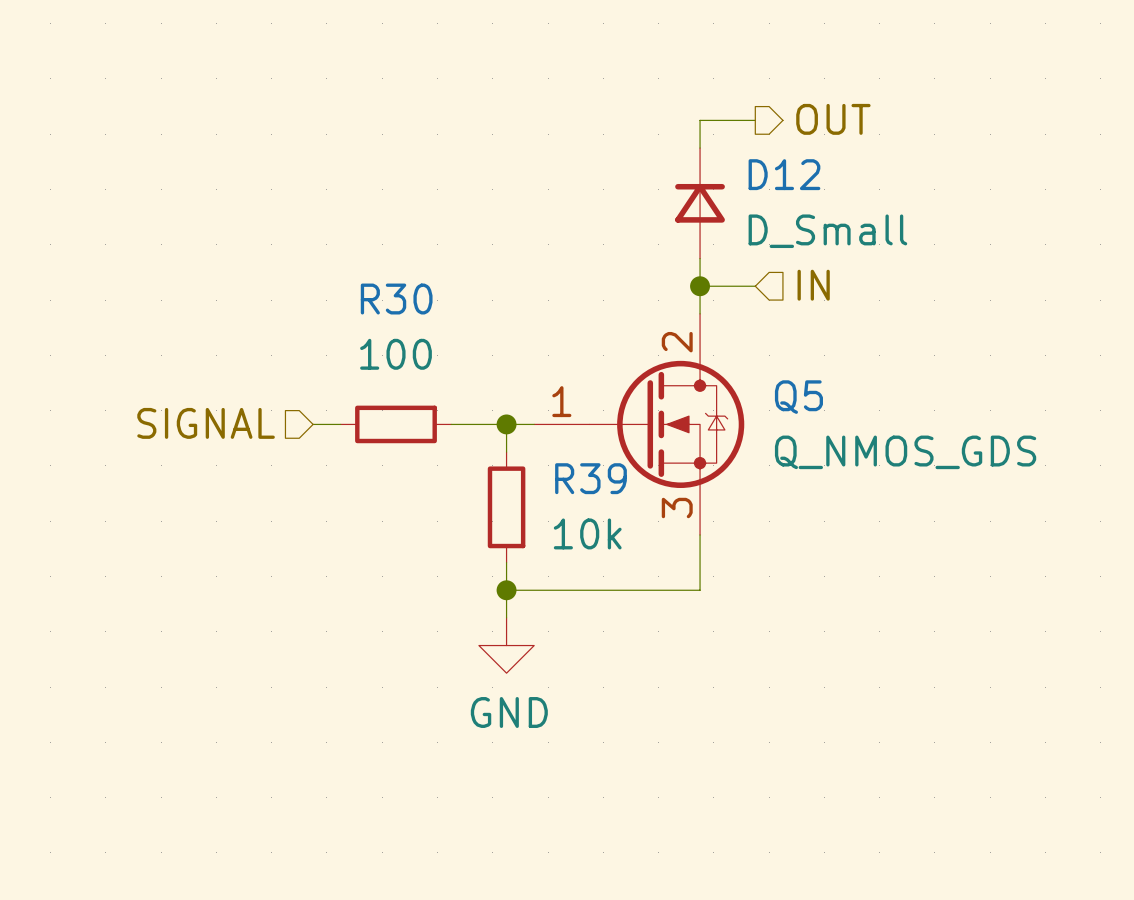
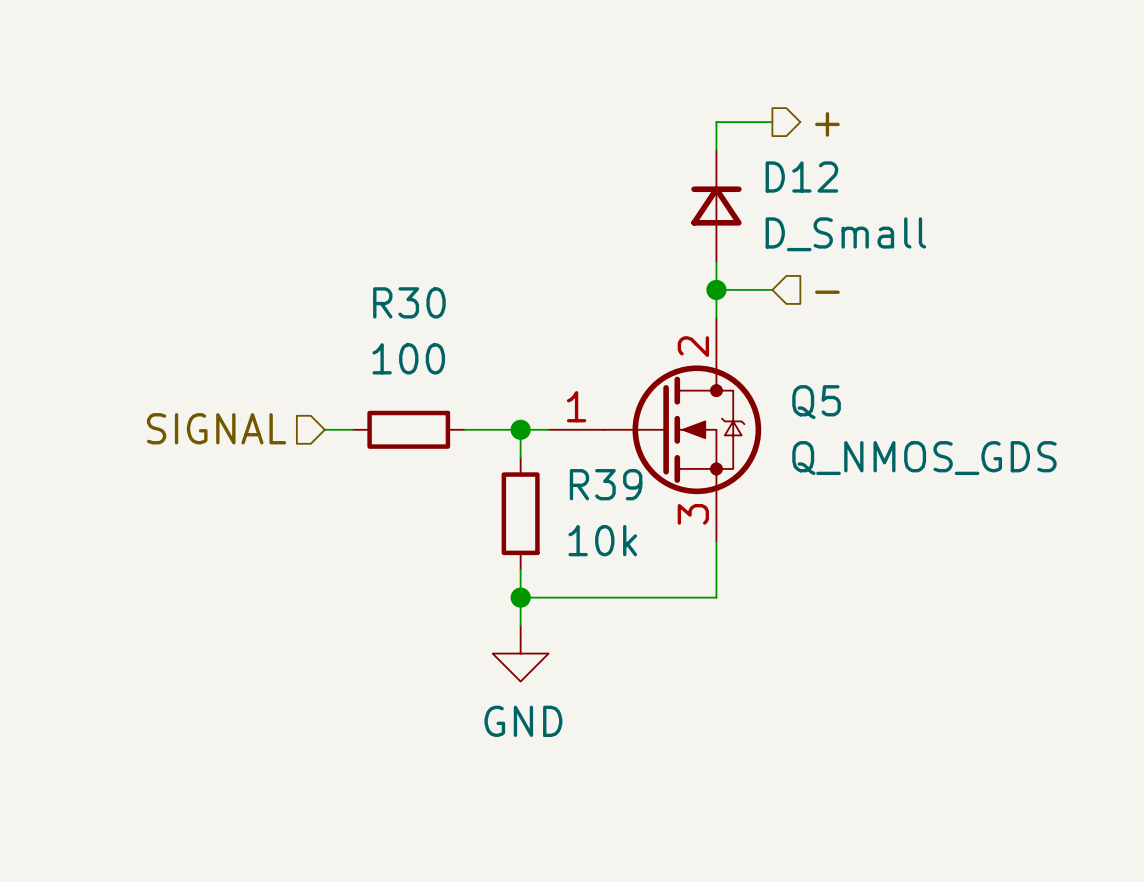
hierarchical label: OUT (833, 119) -> + (827, 124)
hierarchical label: IN (813, 285) -> - (827, 292)

